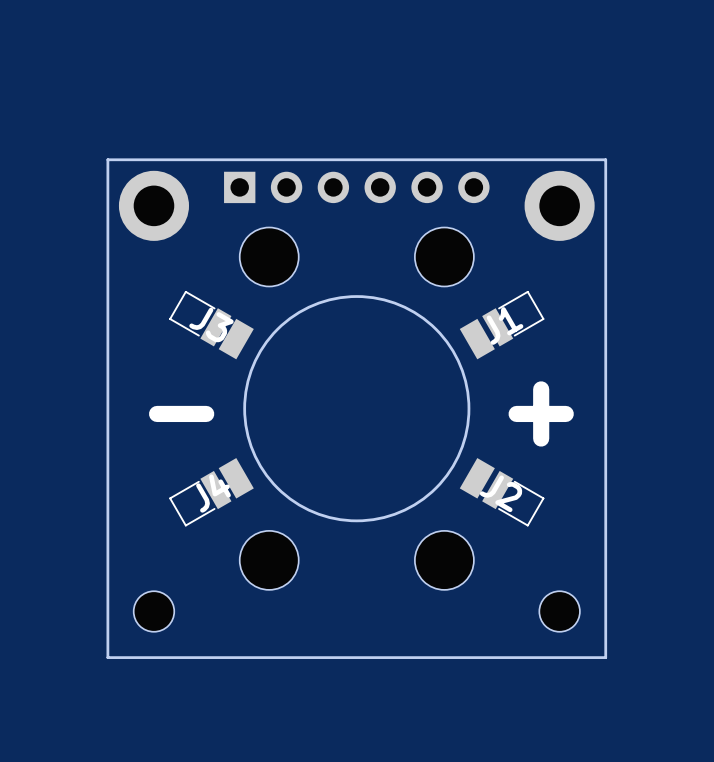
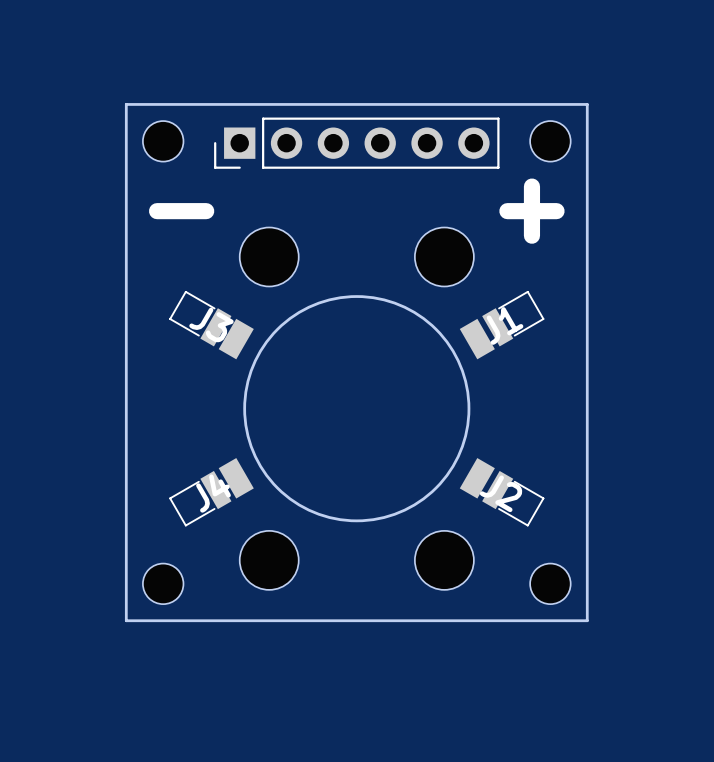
part: none -> (163, 141)
part: none -> (550, 141)
board edge: (107, 159) (605, 159) (605, 657) (107, 657) (107, 159) -> (126, 104) (126, 620) (587, 620) (587, 104) (126, 104)
part side: bottom (356, 187) -> top (356, 143)
part: (153, 205) -> none
part: (559, 205) -> none
text position: - (181, 413) -> - (181, 211)
text position: + (541, 413) -> + (531, 211)
part position: (153, 611) -> (163, 583)
part position: (559, 611) -> (550, 583)

